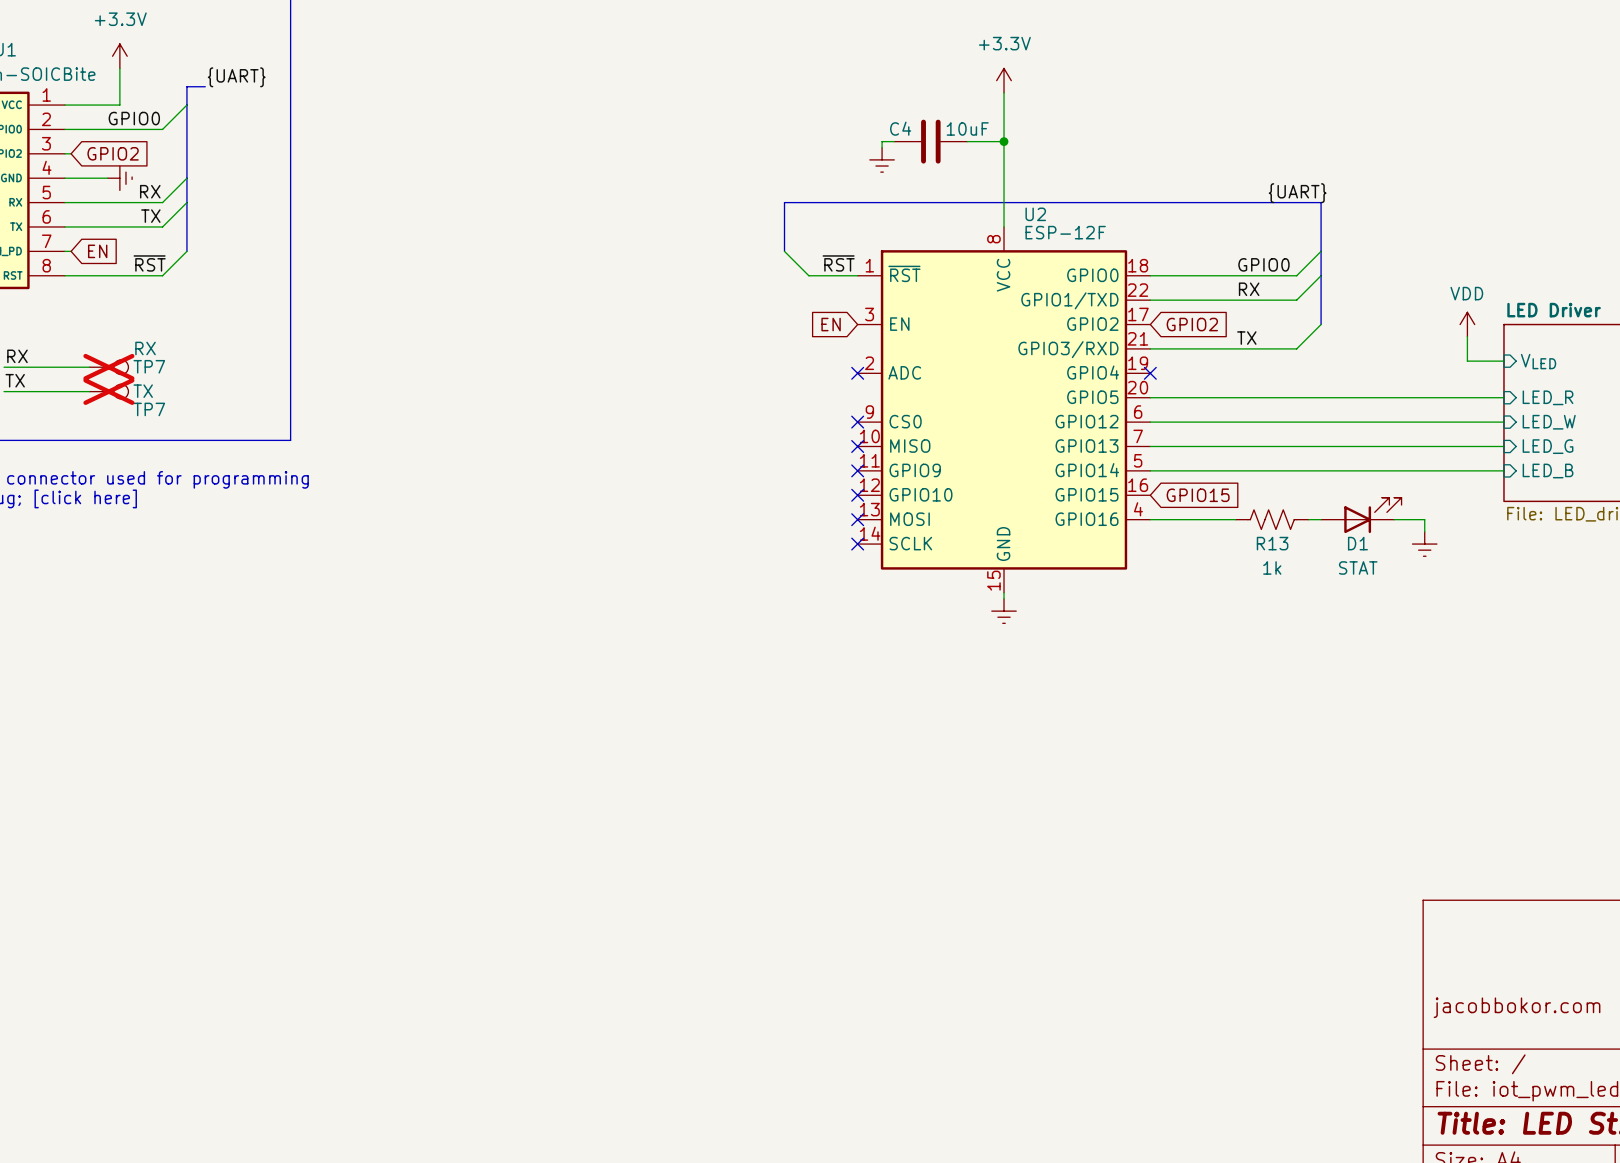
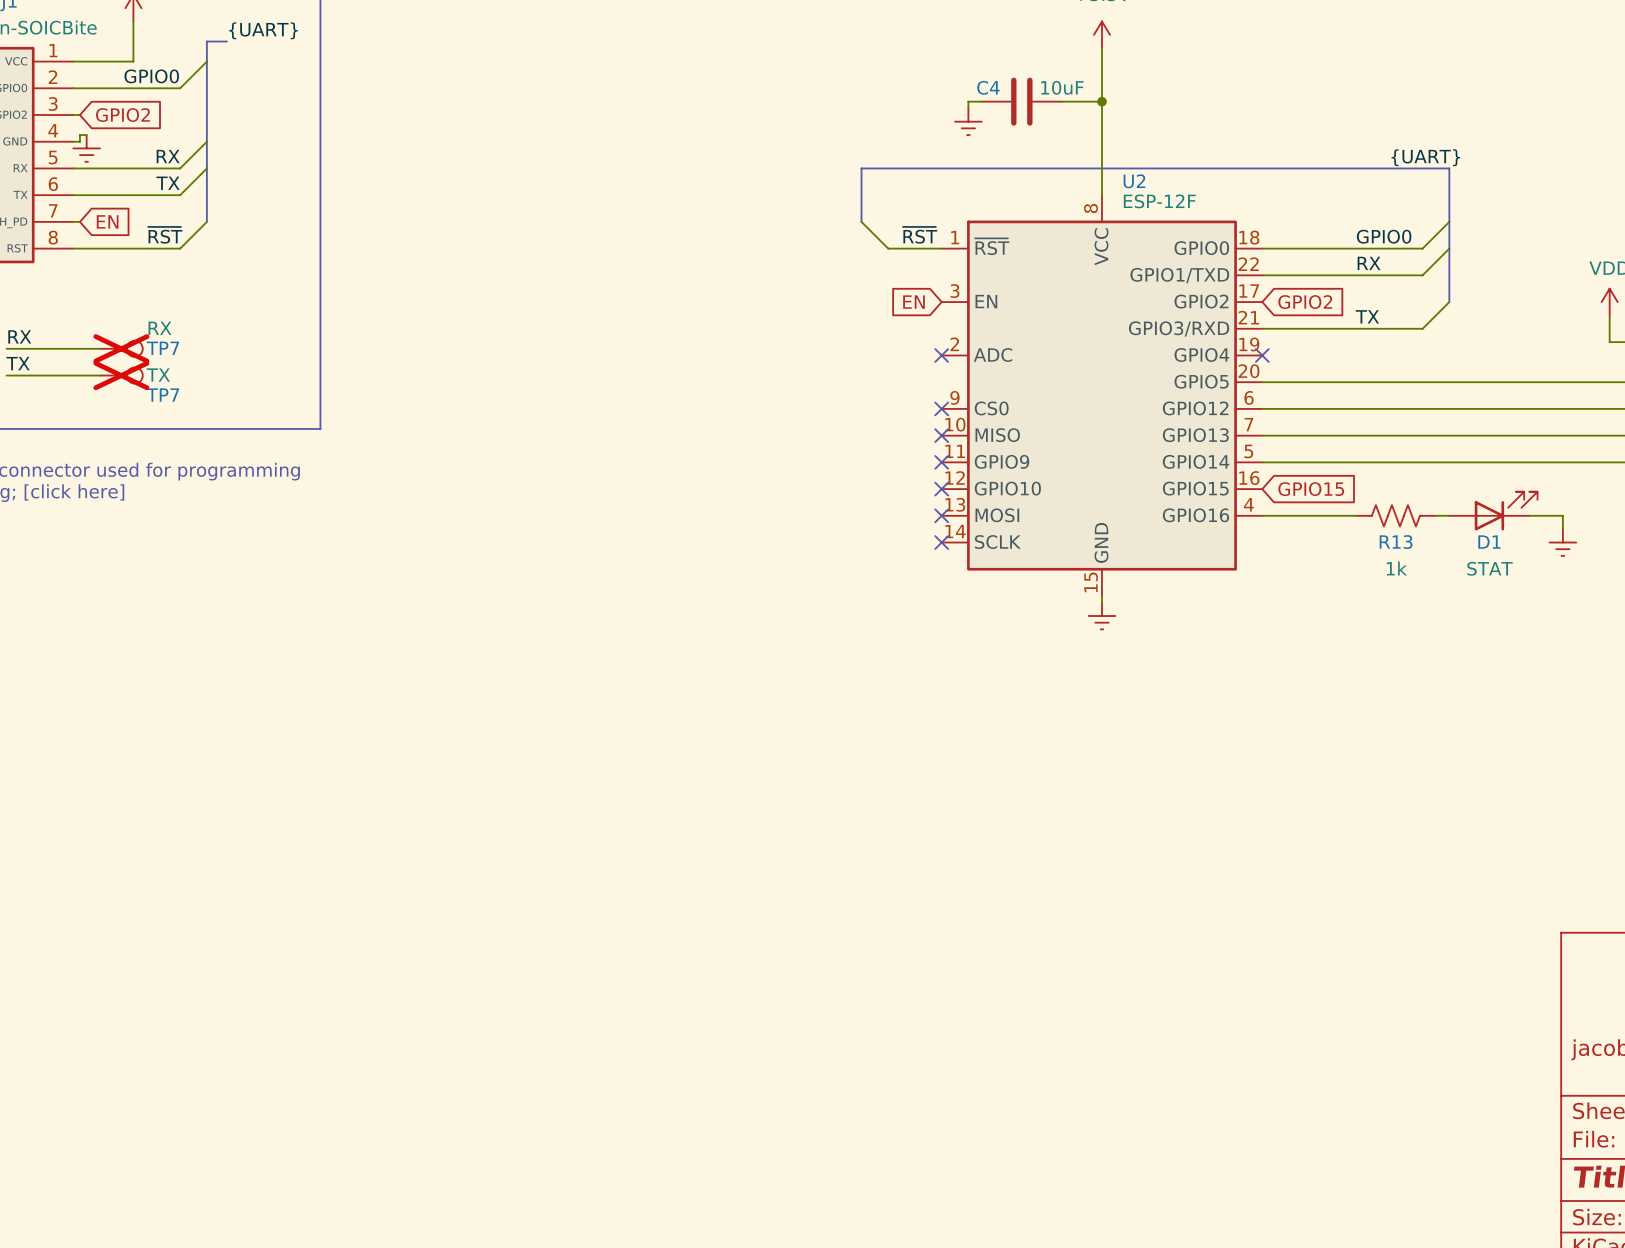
wire: (71, 178) (107, 178) -> (79, 141) (79, 135) (86, 135)
power symbol rotation: 0° (119, 178) -> 90° clockwise (86, 148)
power symbol position: (119, 178) -> (86, 148)

